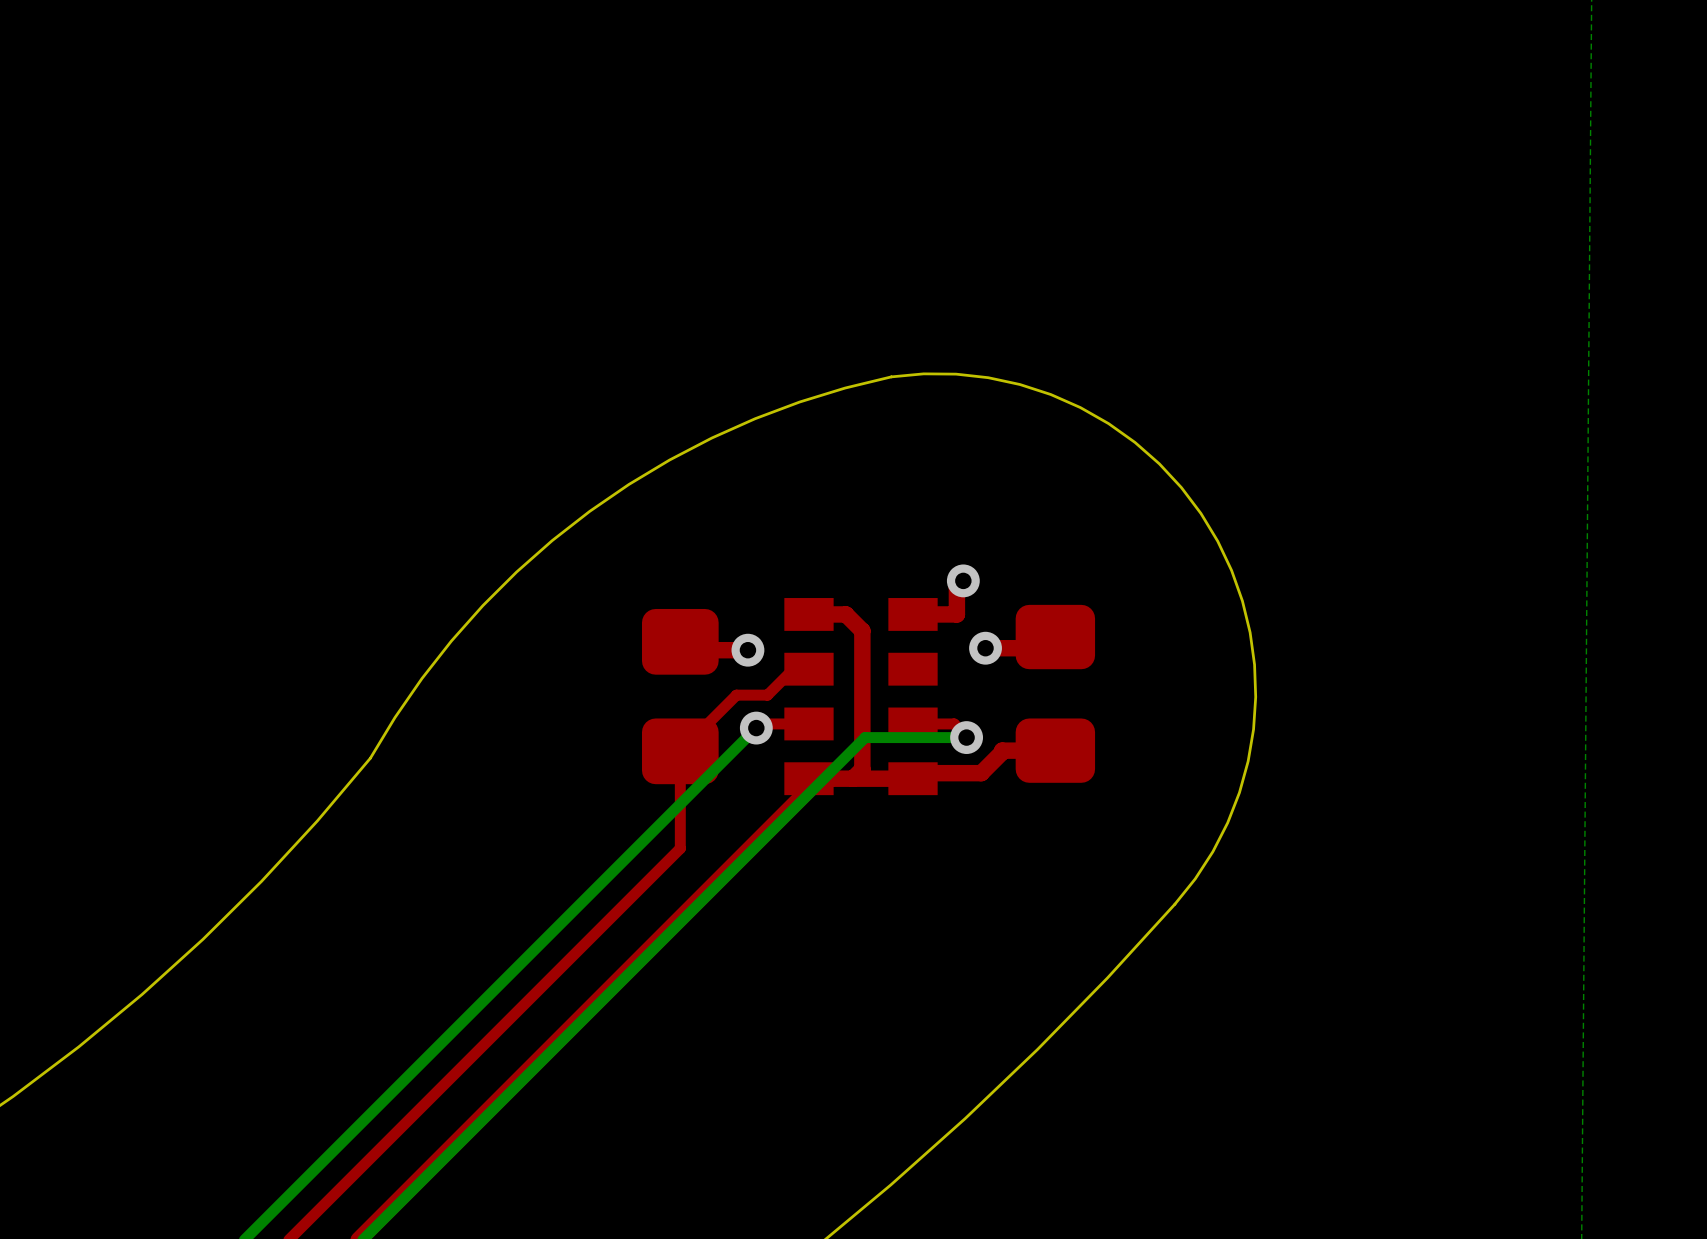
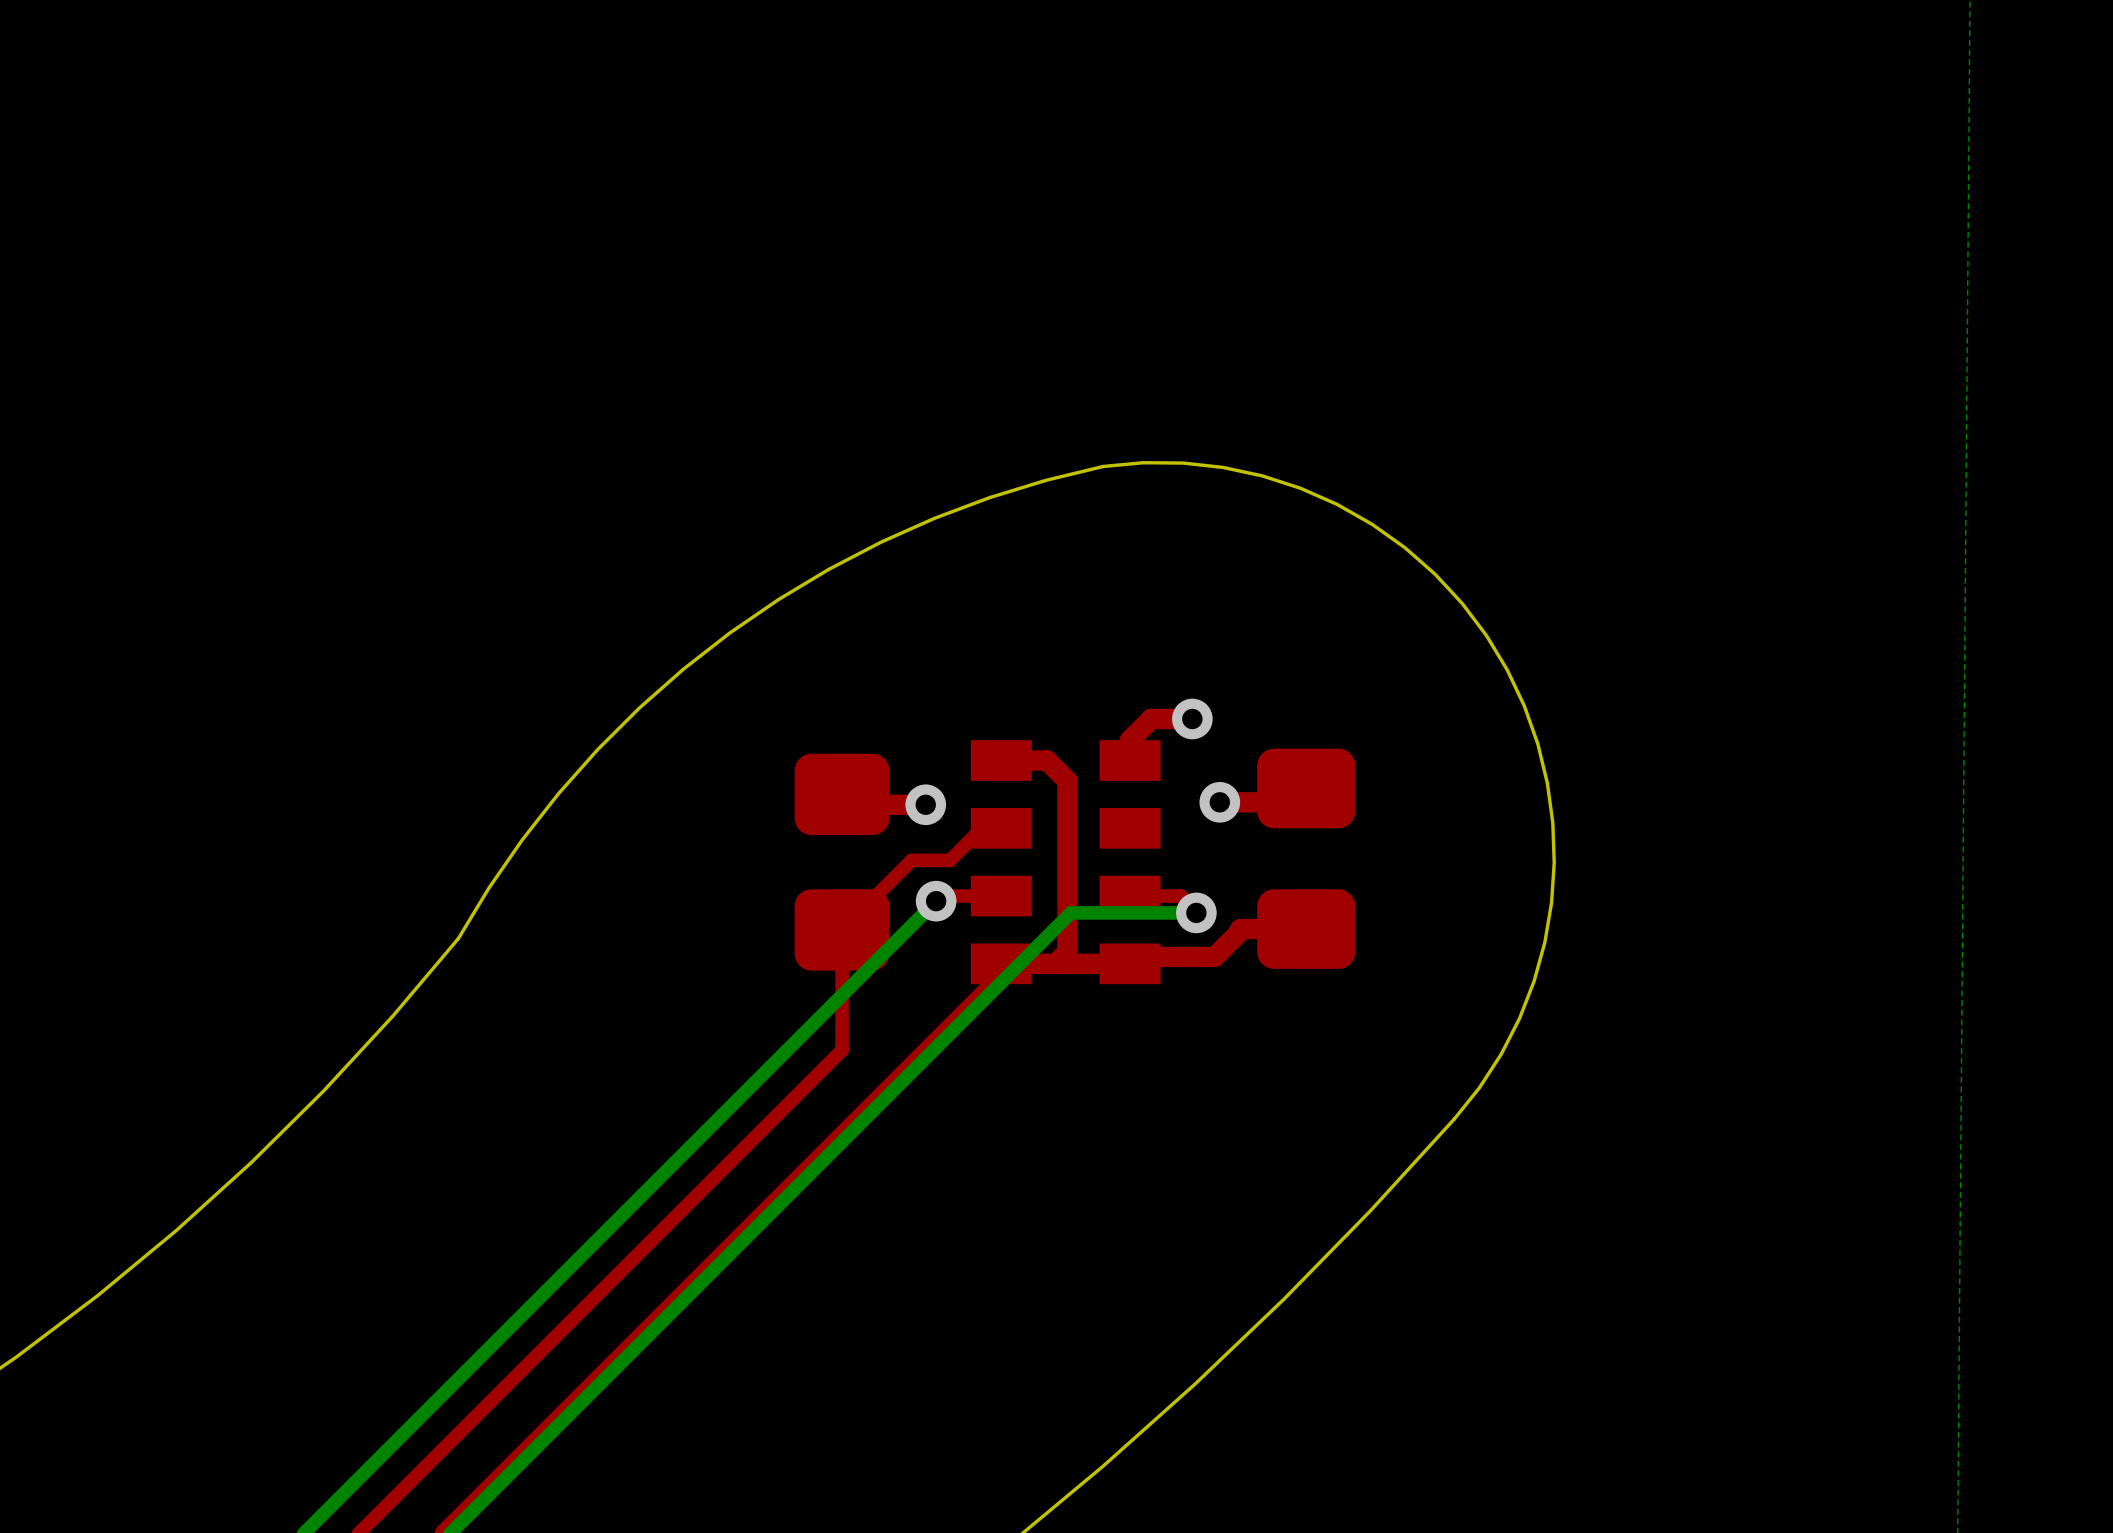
top track: (963, 580) (956, 587) (956, 614) (913, 614) -> (1192, 718) (1151, 718) (1130, 740) (1130, 760)

